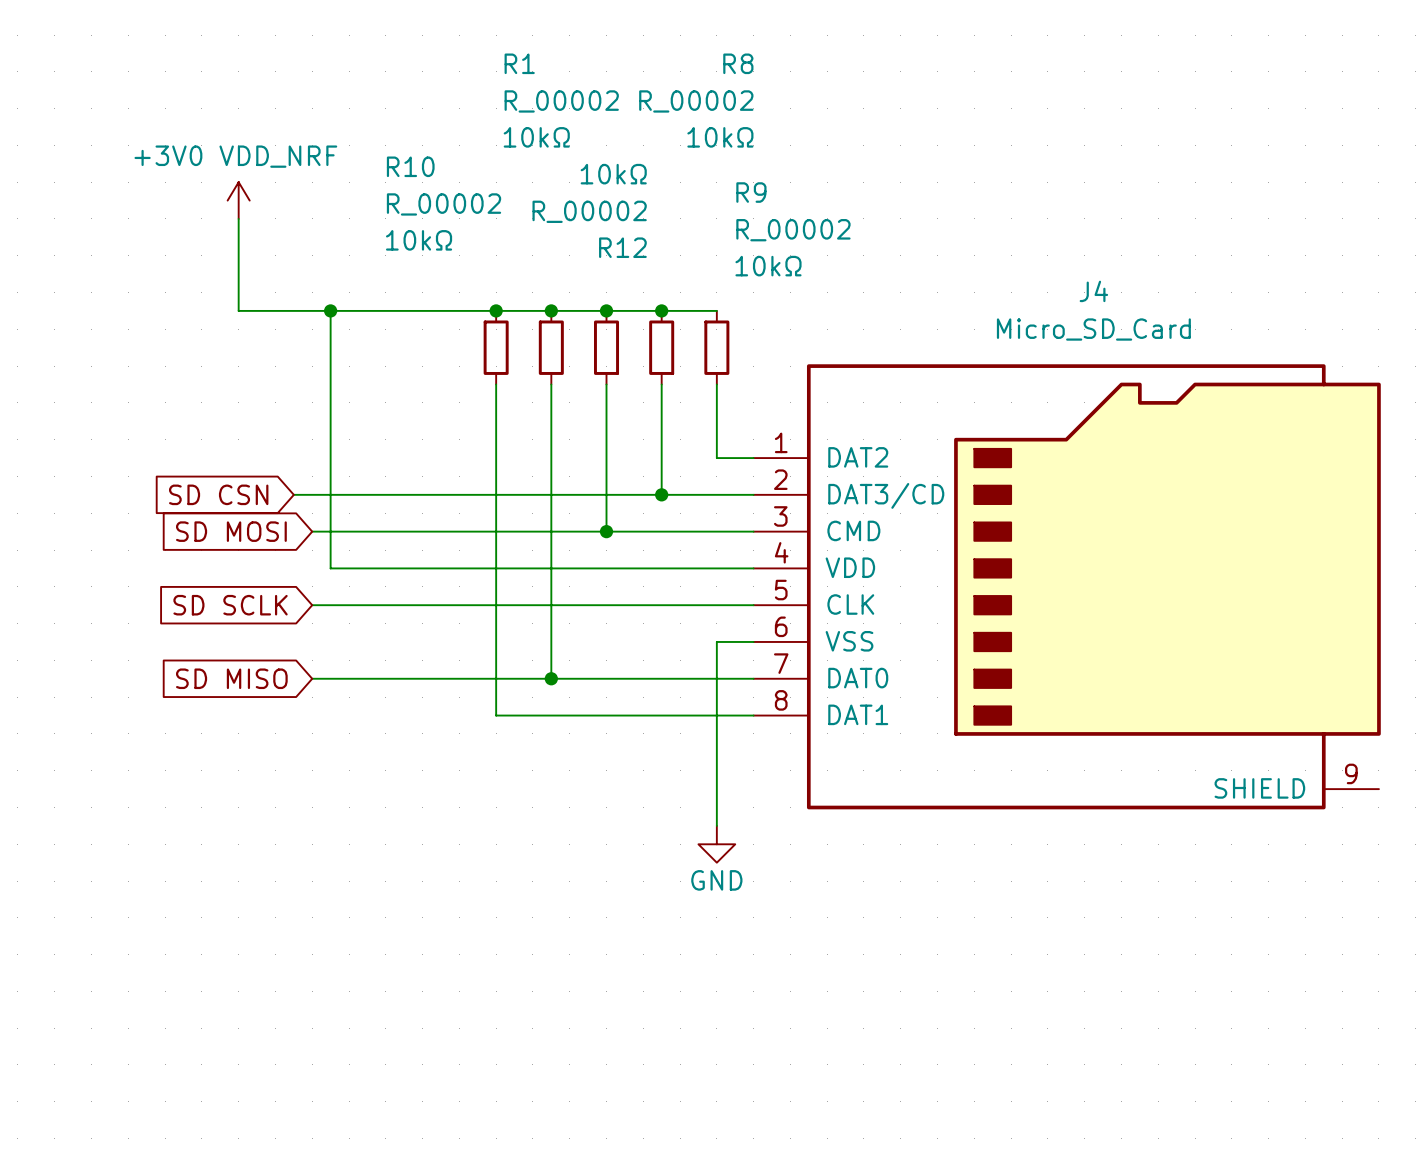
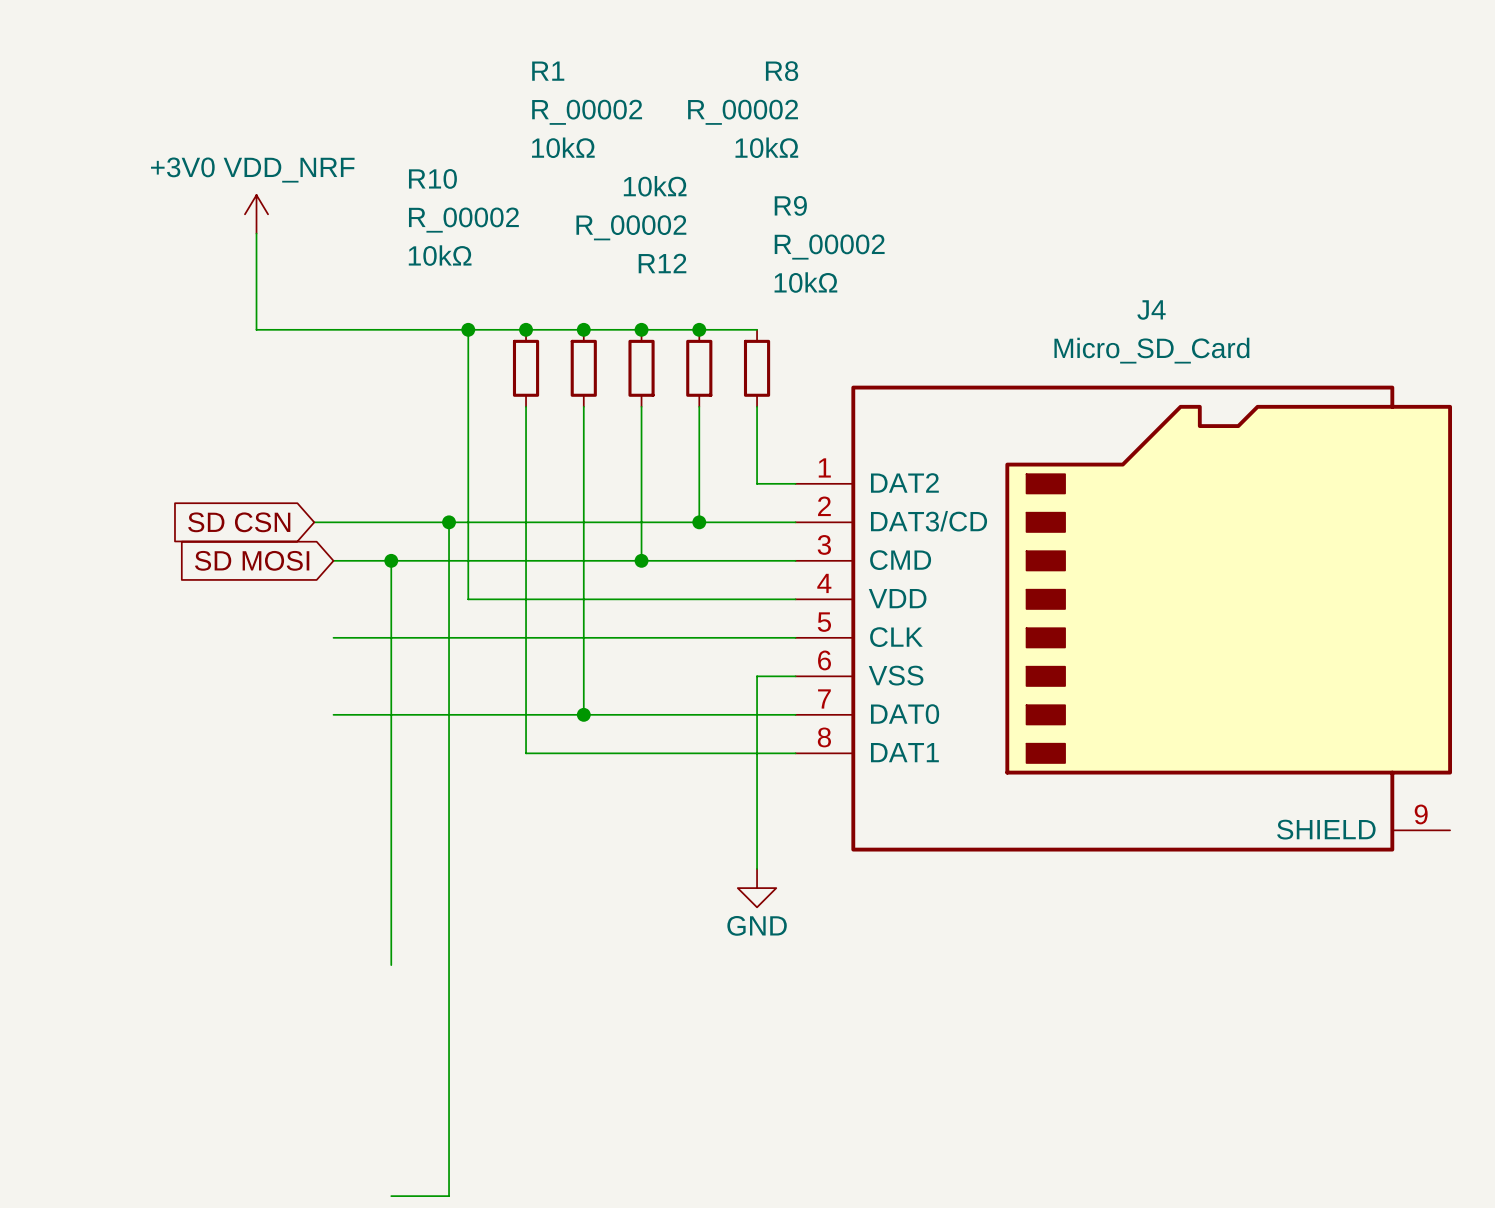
wire: (330, 310) (330, 568) (440, 568) -> (468, 329) (468, 599)
junction: (330, 310) -> none
junction: none -> (468, 329)
wire: none -> (449, 522) (449, 1196) (391, 1196)
junction: none -> (449, 522)
wire: none -> (391, 560) (391, 965)
junction: none -> (391, 560)
global label: SD SCLK (230, 605) -> none
global label: SD MISO (231, 678) -> none

